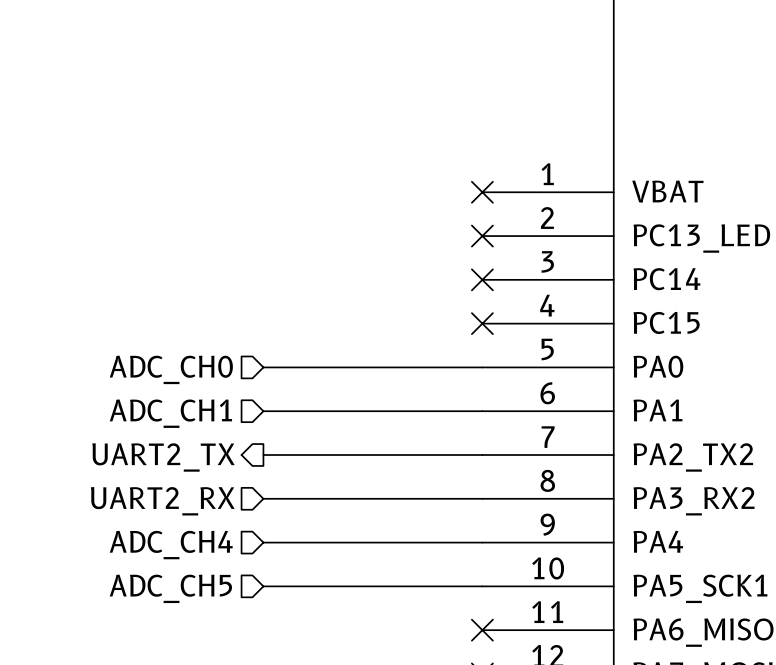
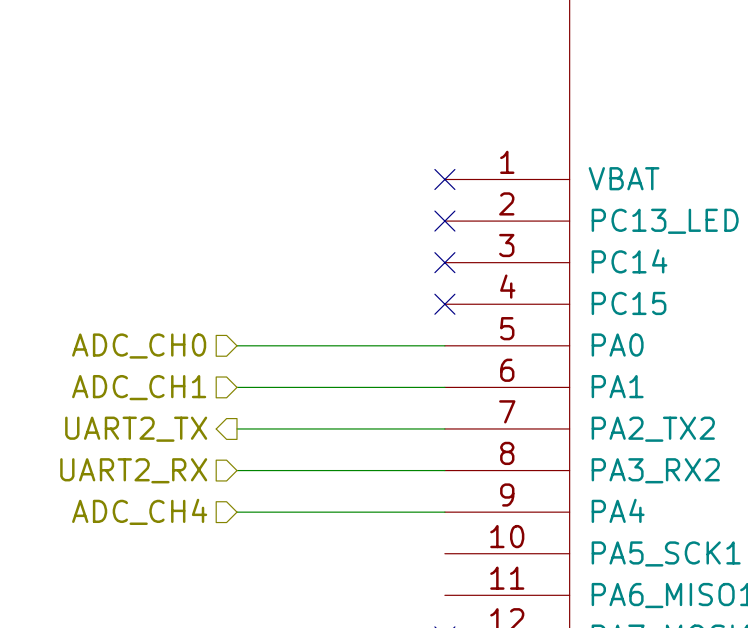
wire: (263, 586) (482, 586) -> none
hierarchical label: ADC_CH5 (170, 588) -> none
no-connect mark: (482, 630) -> none

